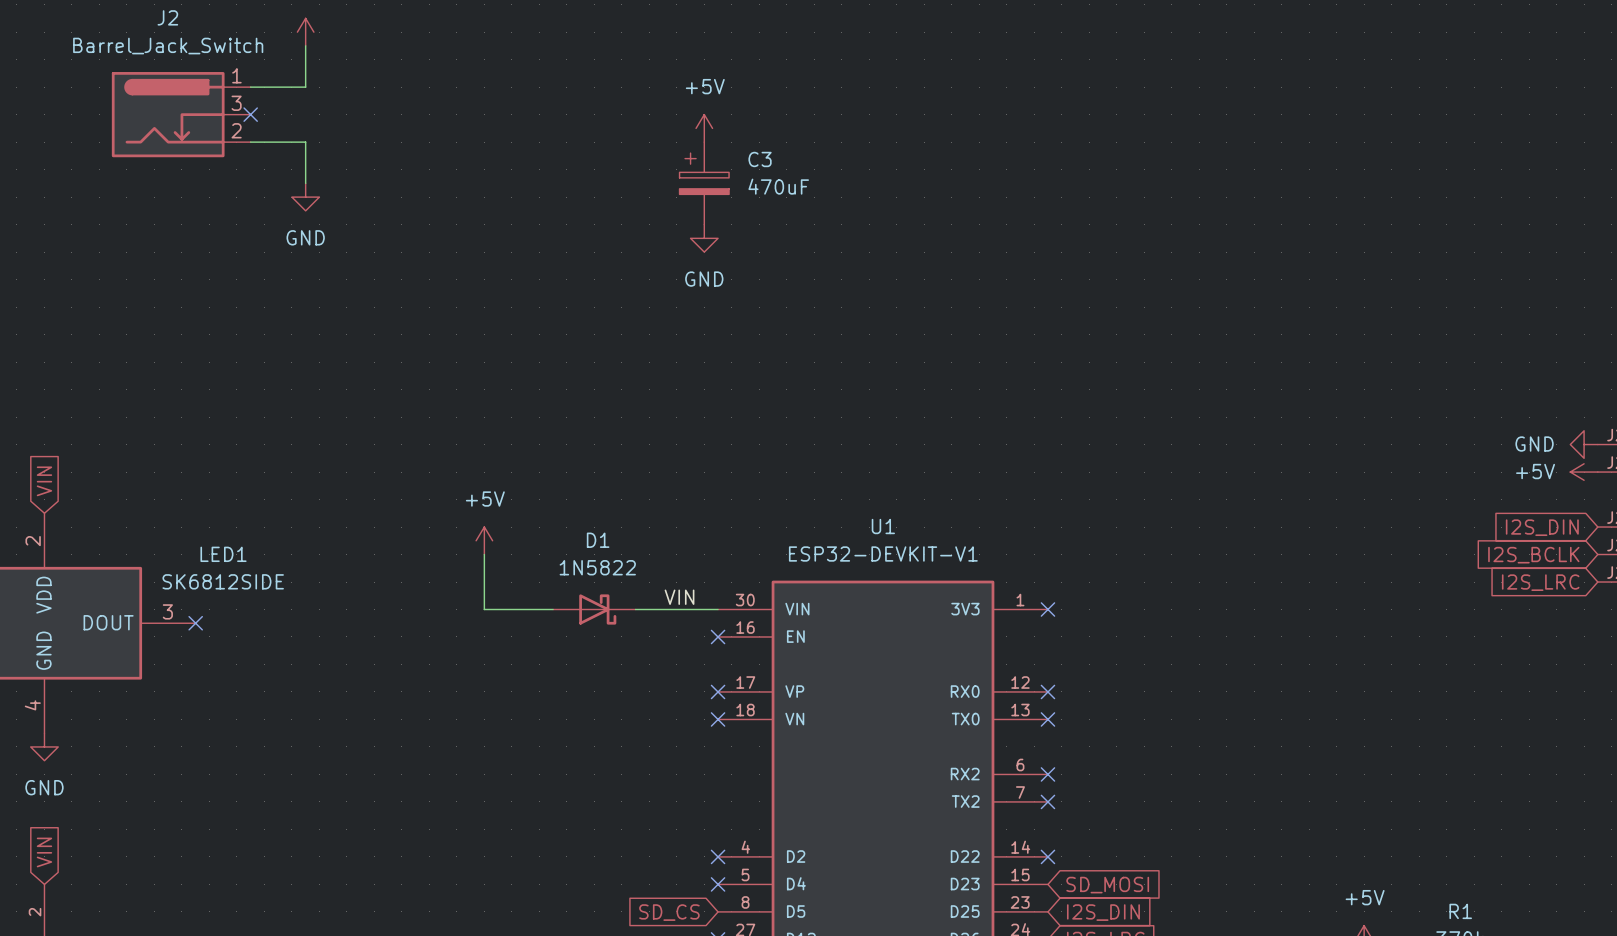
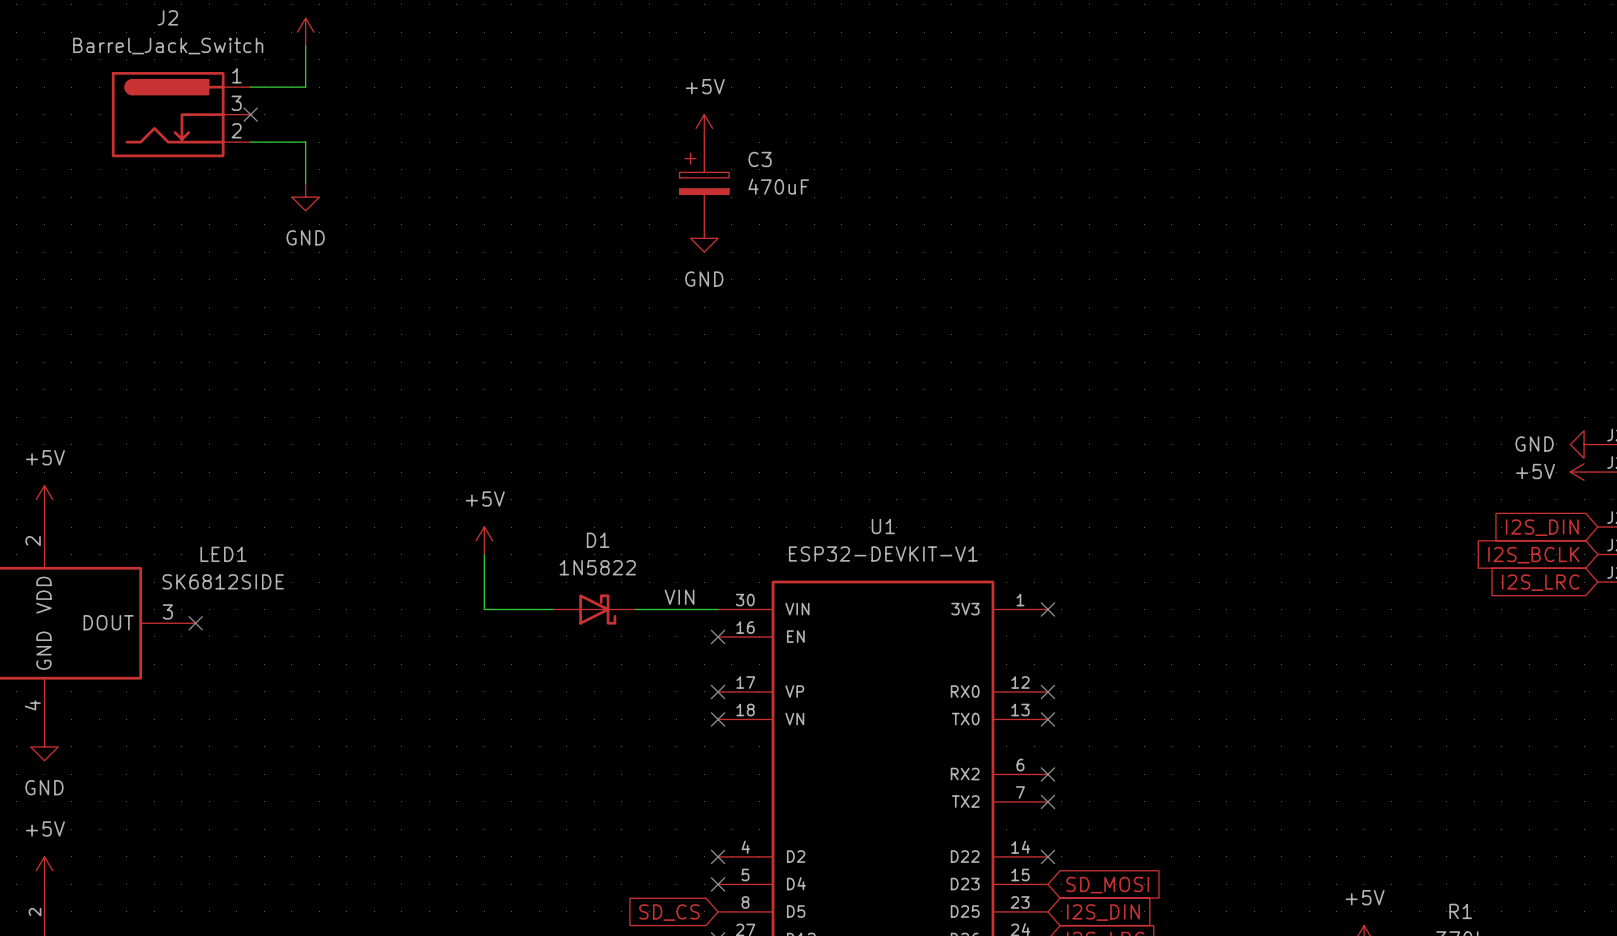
global label: VIN (44, 481) -> none
power symbol: none -> +5V (44, 499)
global label: VIN (44, 852) -> none
power symbol: none -> +5V (44, 870)

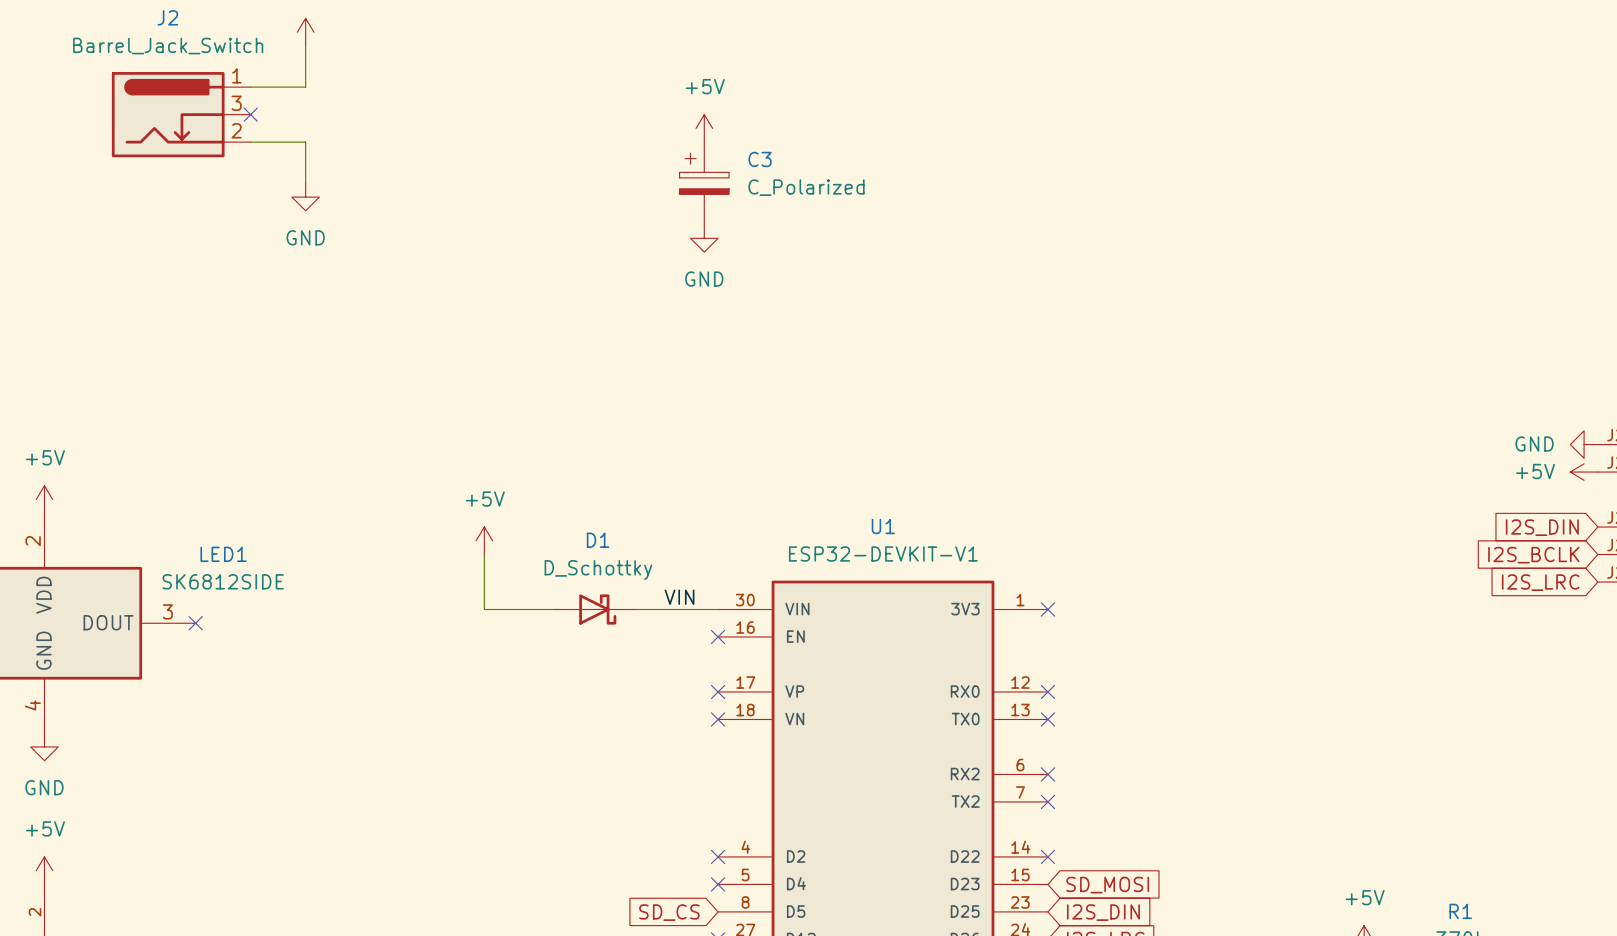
C3 value: 470uF (778, 186) -> C_Polarized (806, 187)
D1 value: 1N5822 (597, 567) -> D_Schottky (598, 570)

